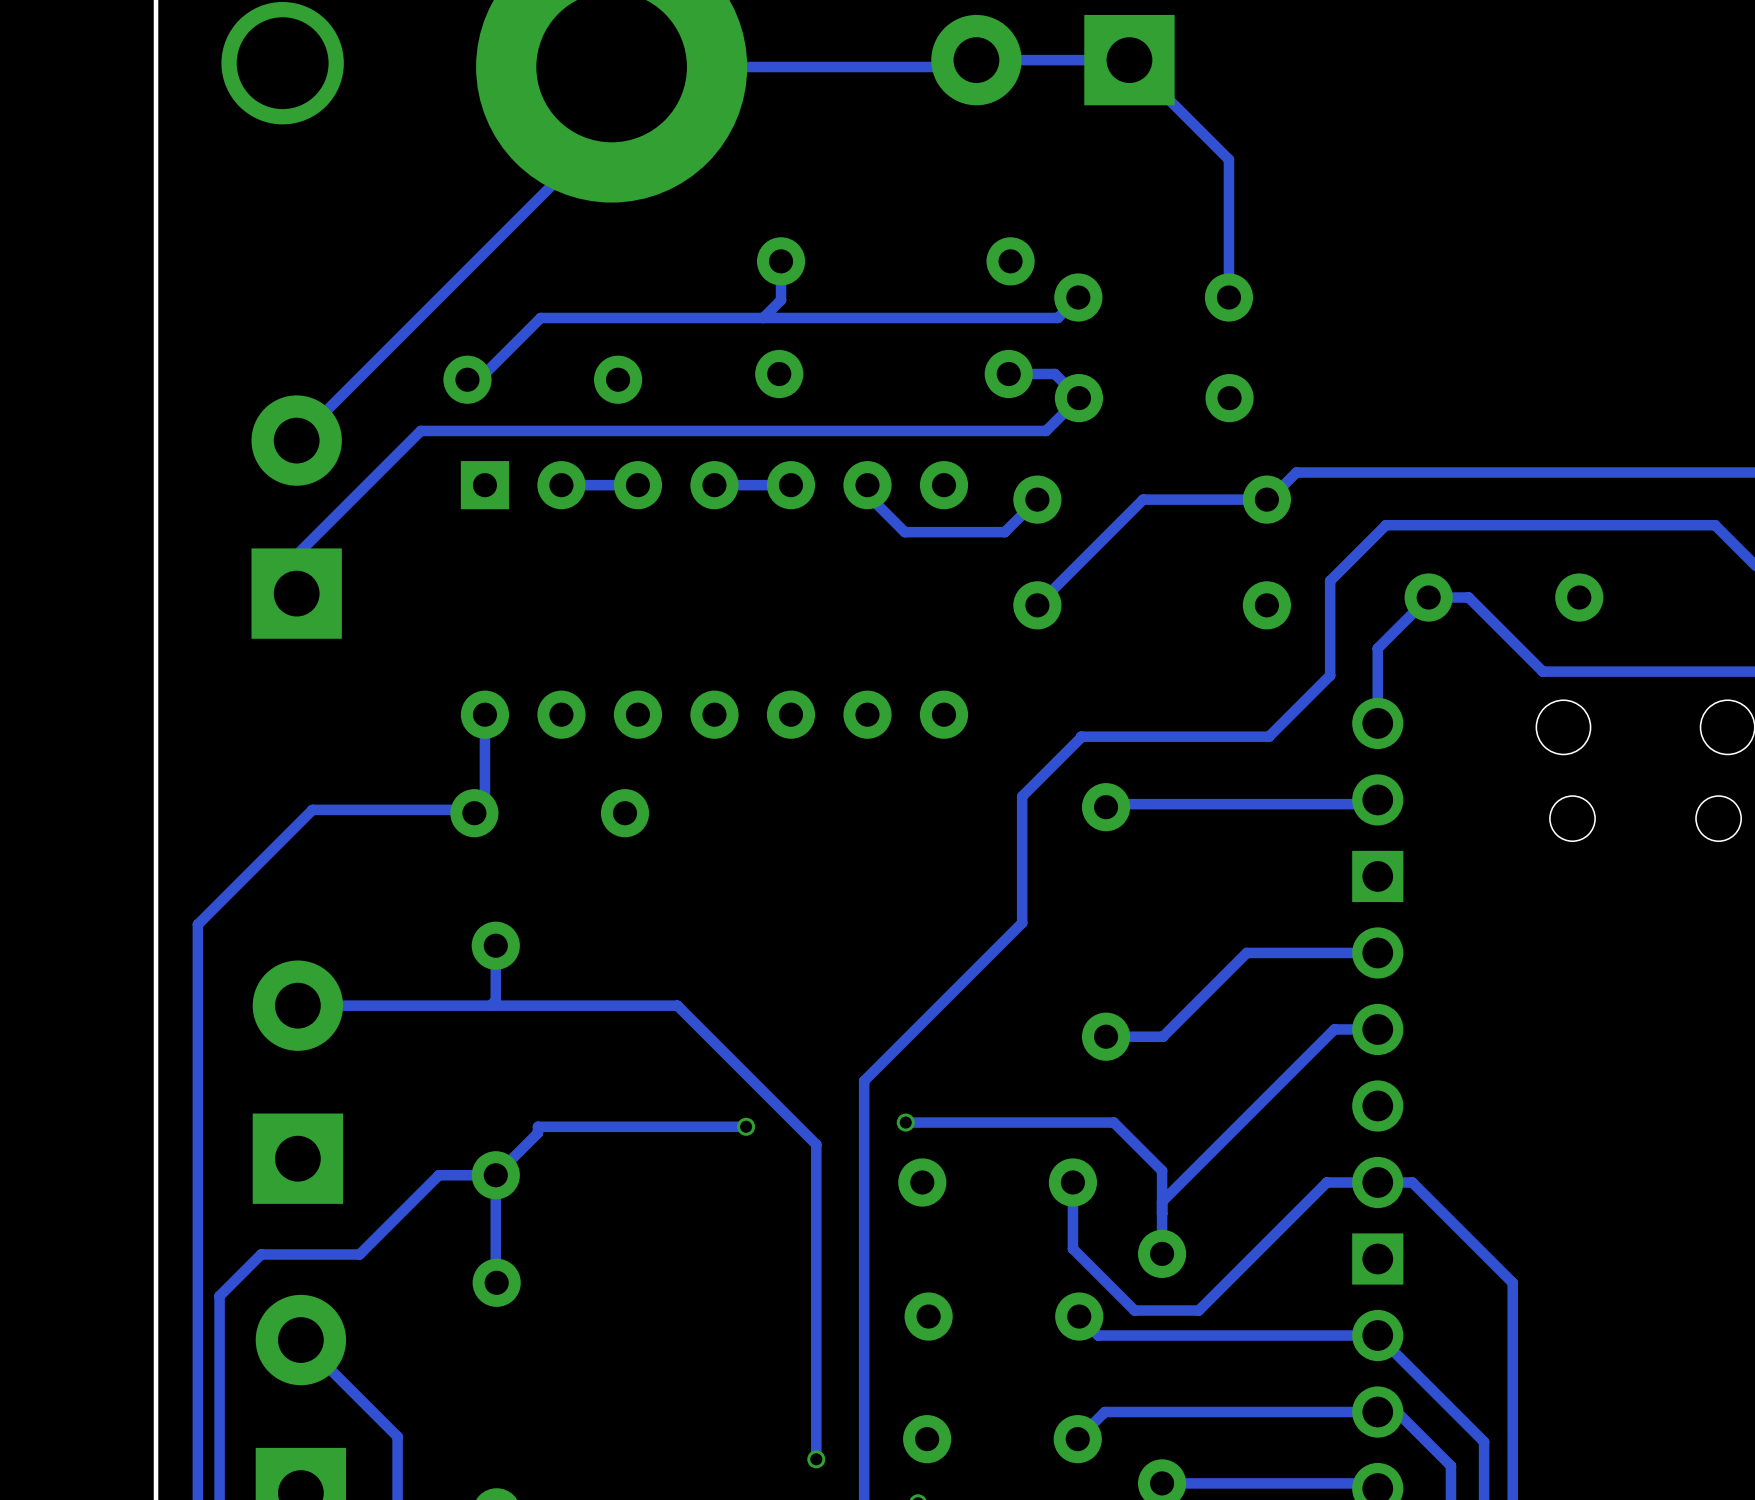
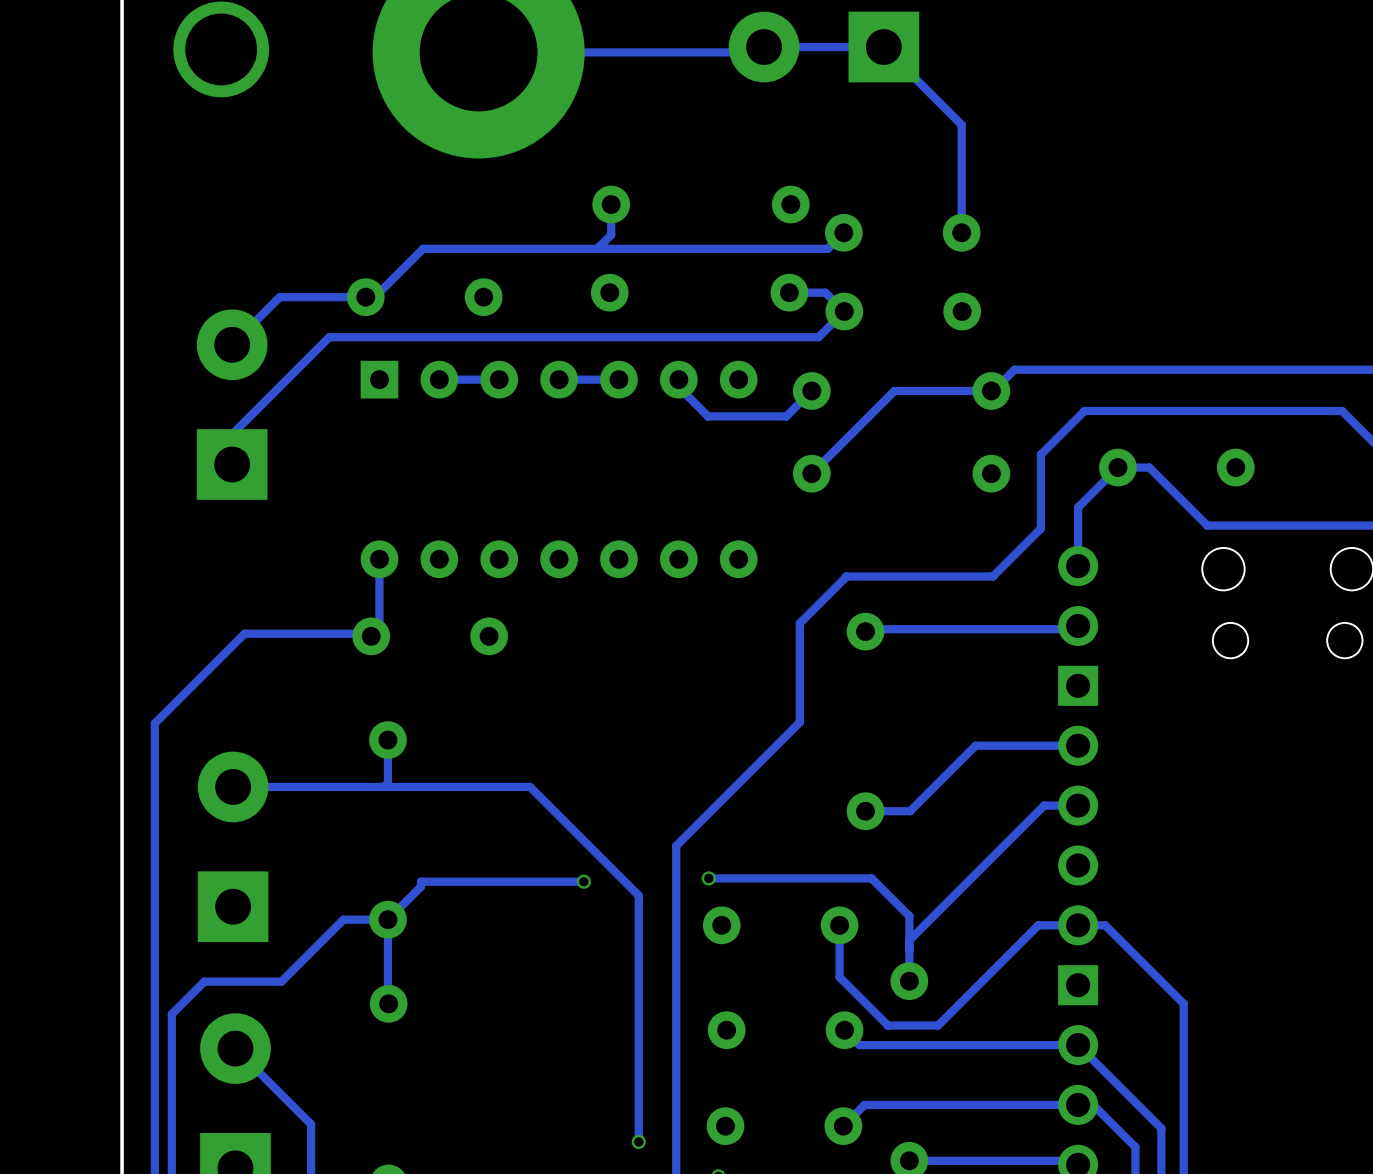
track: (611, 125) (357, 379) -> (365, 297) (279, 297)

